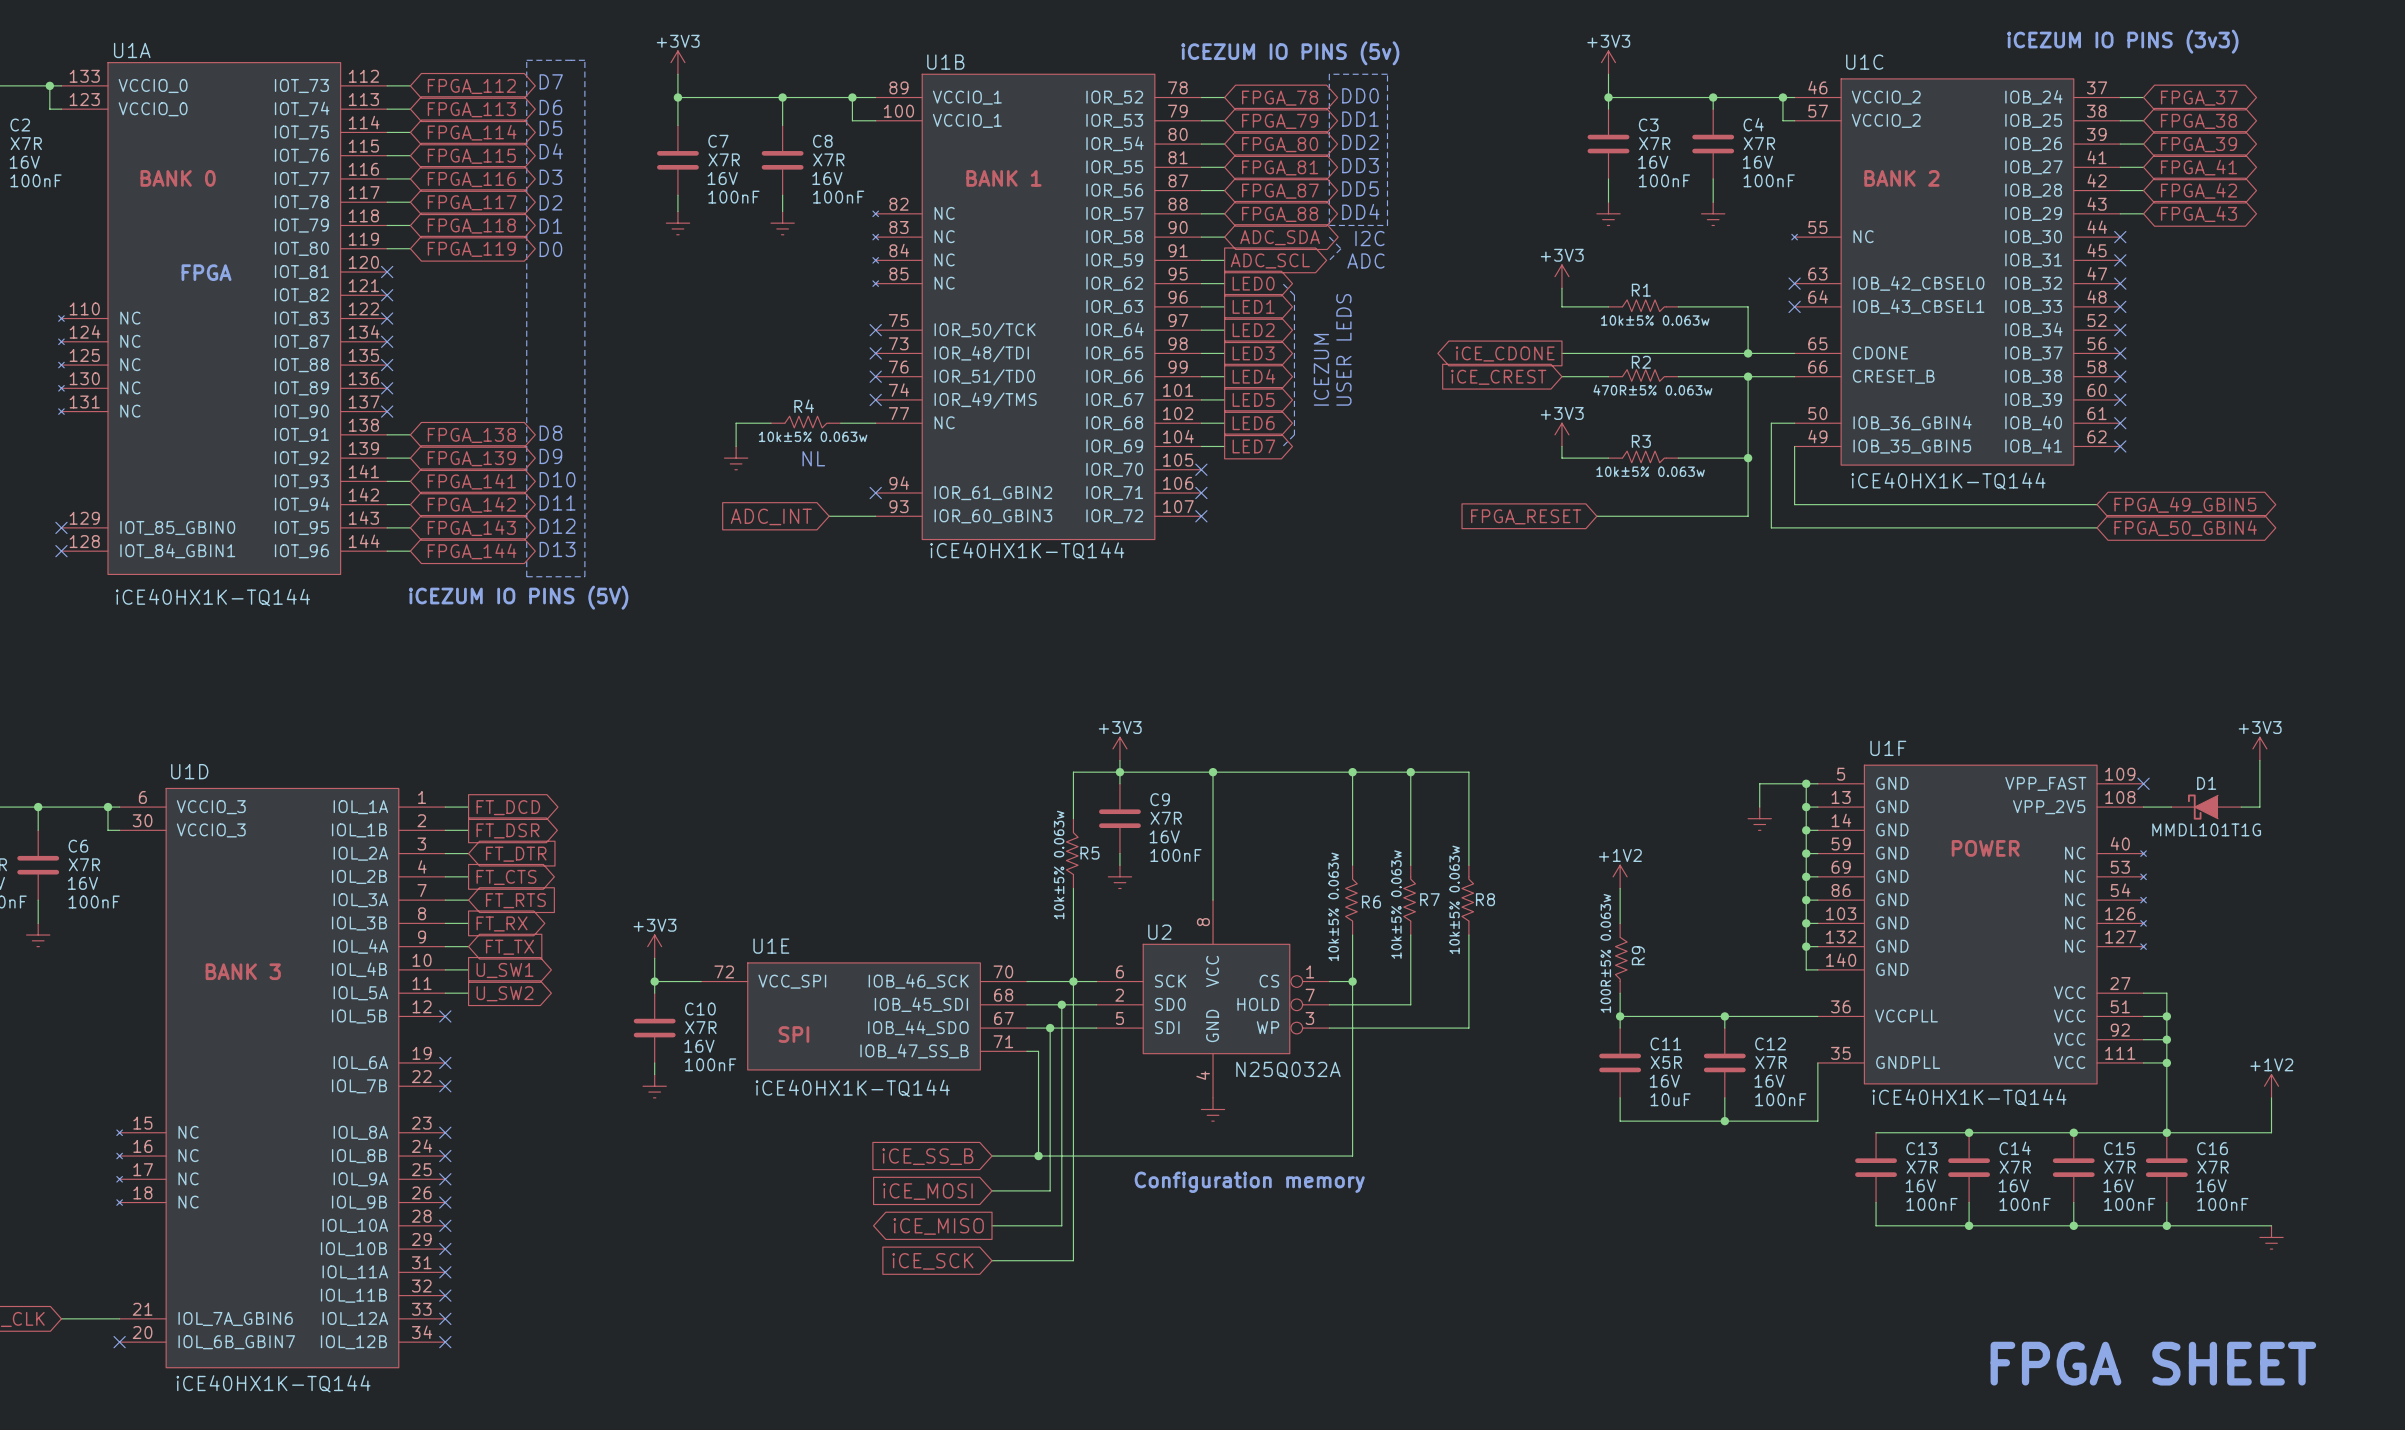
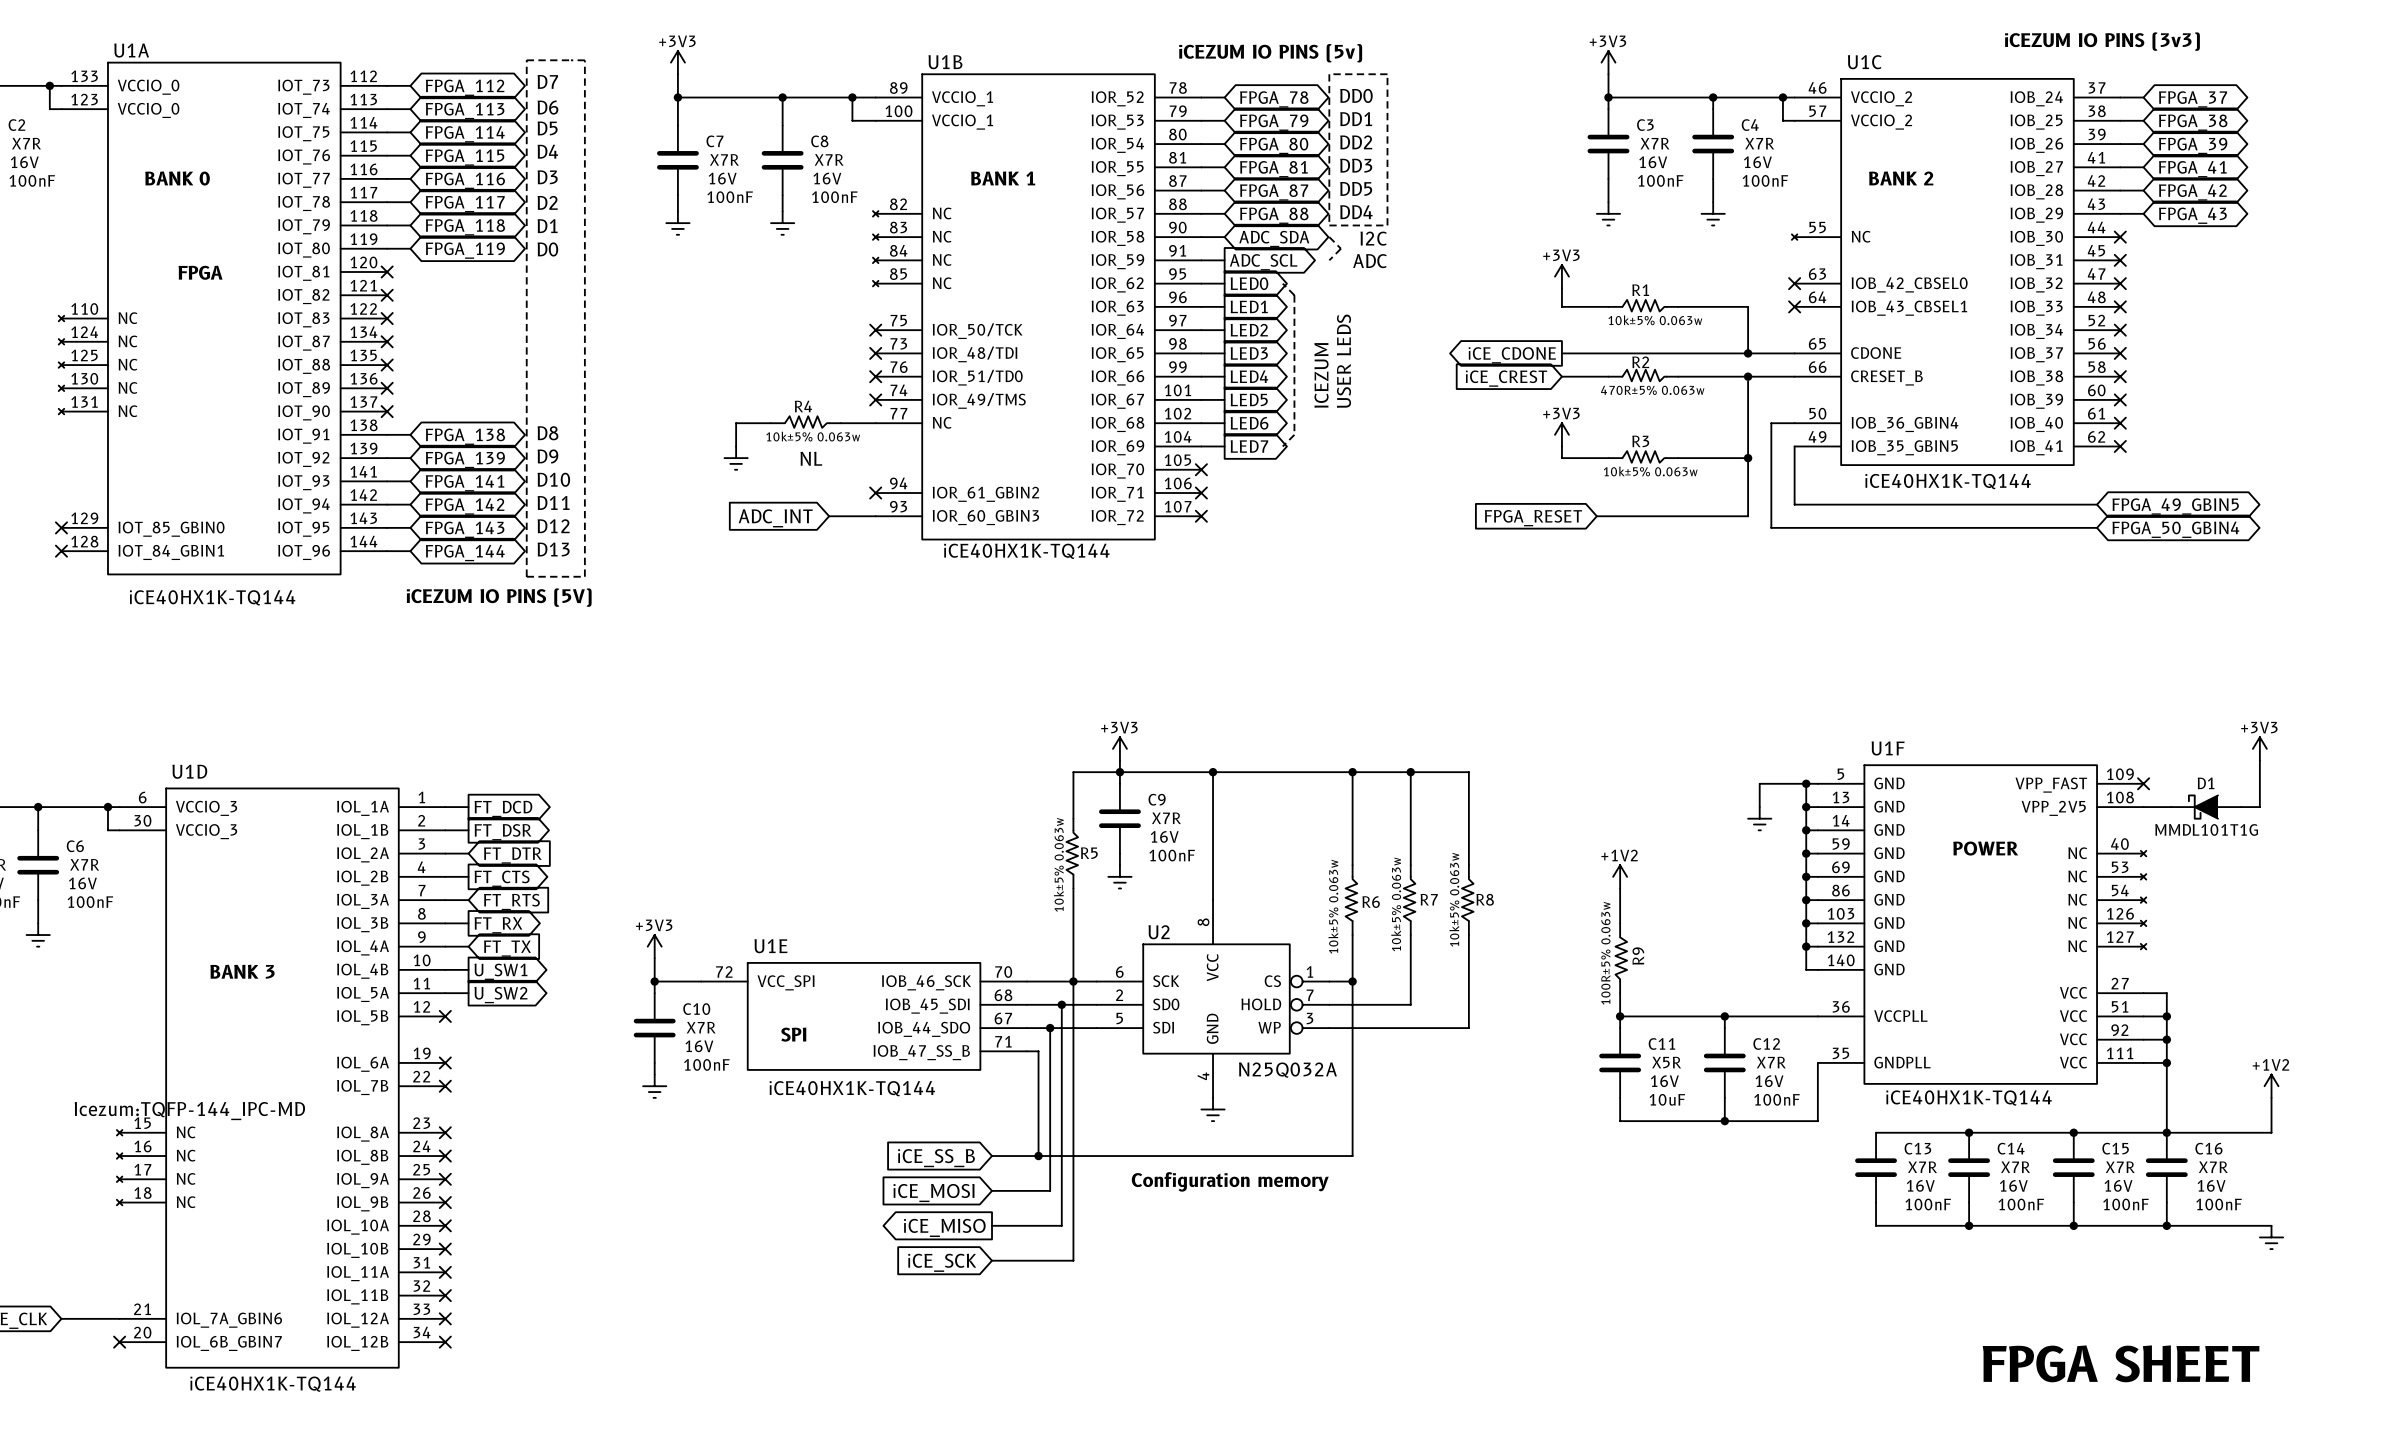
U1D text: none -> Icezum:TQFP-144_IPC-MD (189, 1111)

